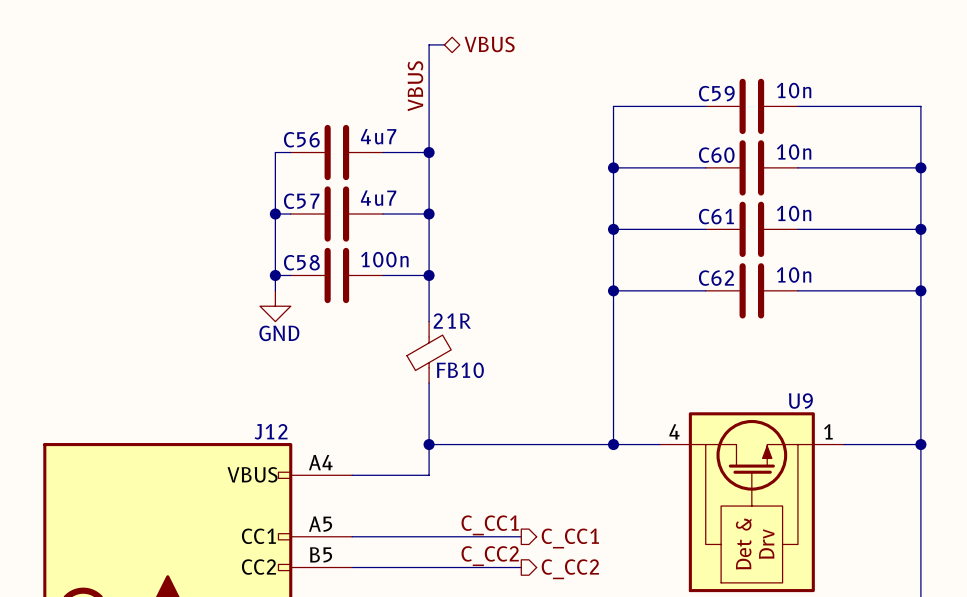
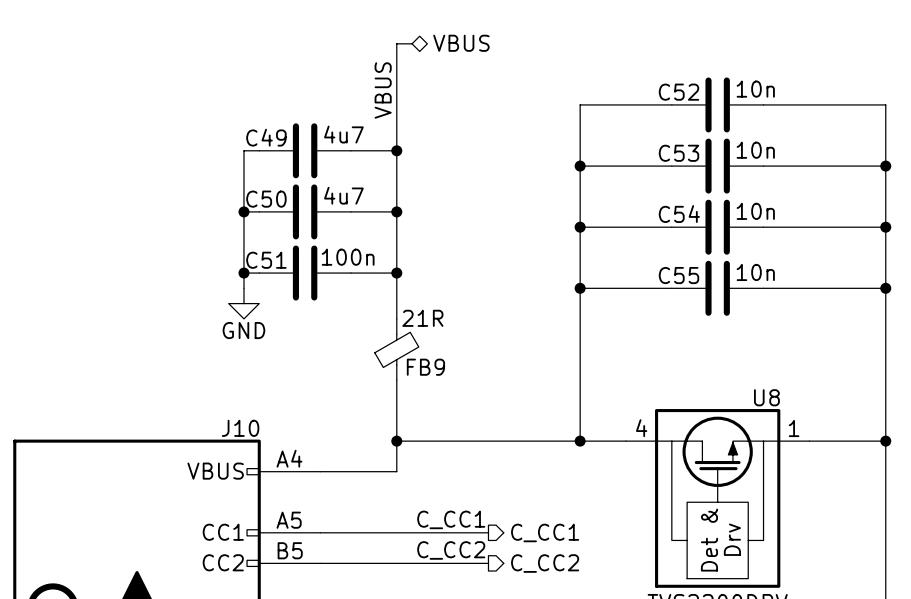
C59 name: C59 (716, 93) -> C52 (679, 92)
C56 name: C56 (301, 139) -> C49 (266, 137)
C60 name: C60 (716, 155) -> C53 (679, 153)
C57 name: C57 (301, 201) -> C50 (266, 199)
C61 name: C61 (716, 216) -> C54 (679, 214)
C58 name: C58 (301, 262) -> C51 (266, 260)
C62 name: C62 (716, 278) -> C55 (679, 275)
FB10 name: FB10 (460, 370) -> FB9 (425, 367)
U9 name: U9 (800, 401) -> U8 (766, 397)
J12 name: J12 (271, 431) -> J10 (240, 428)

